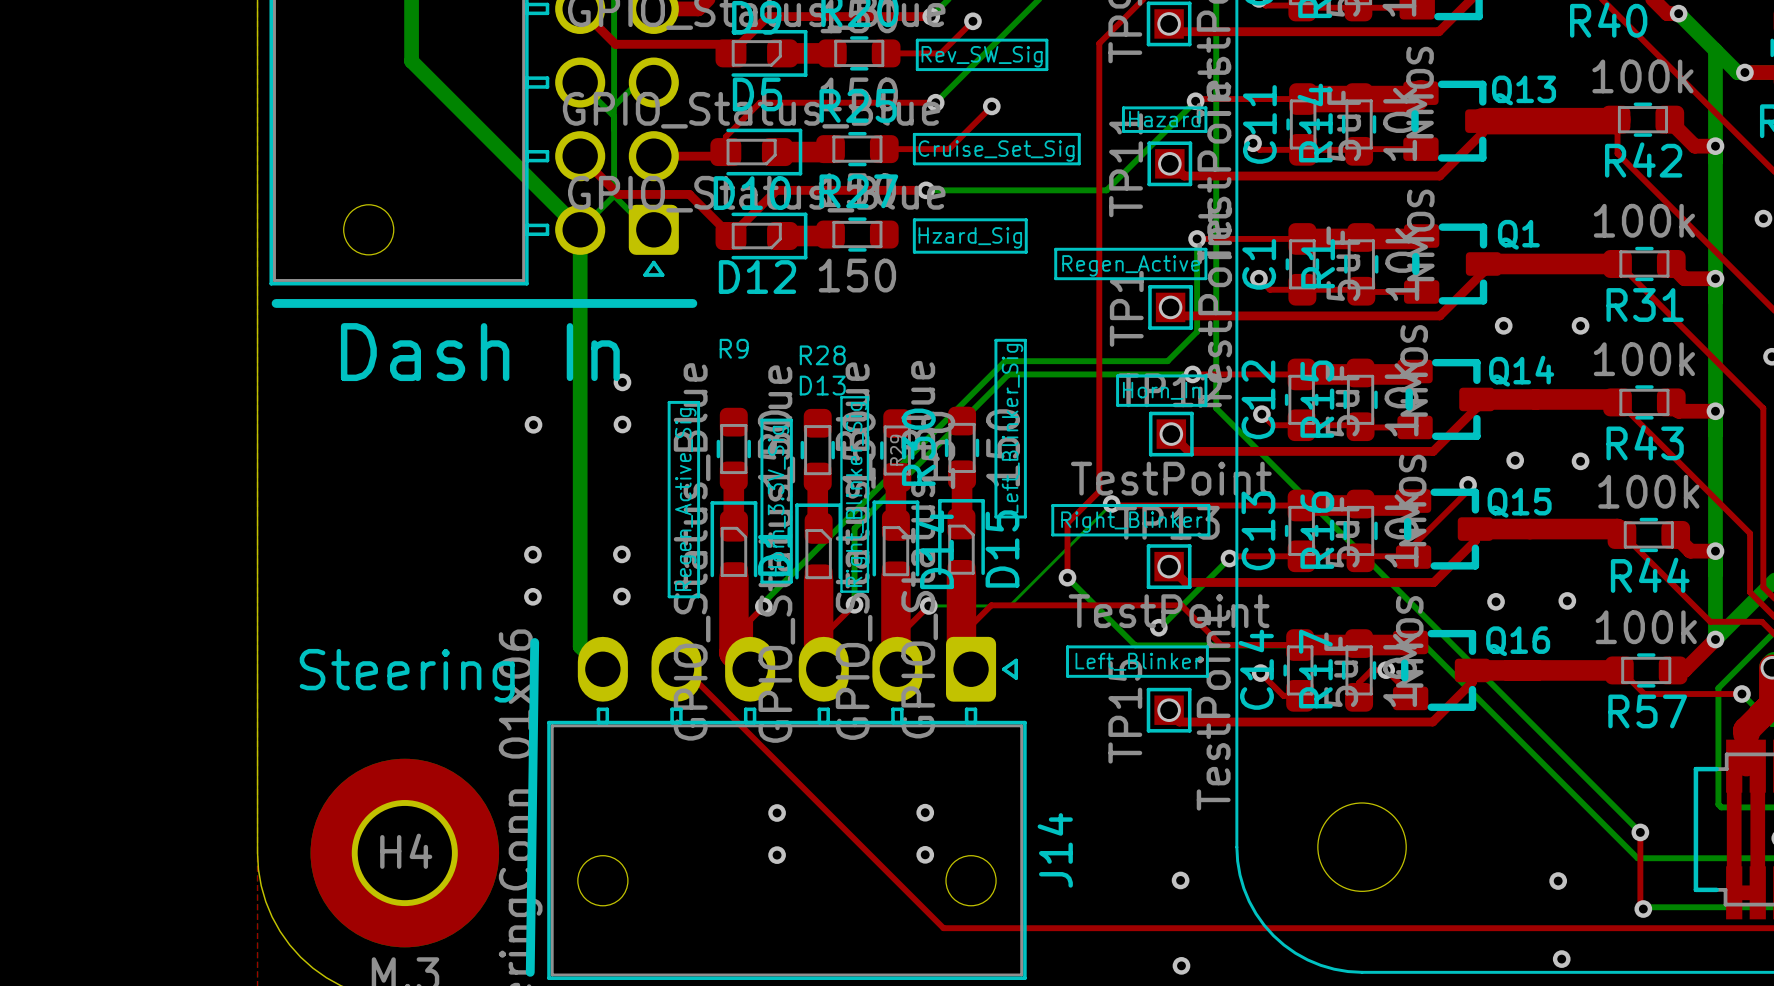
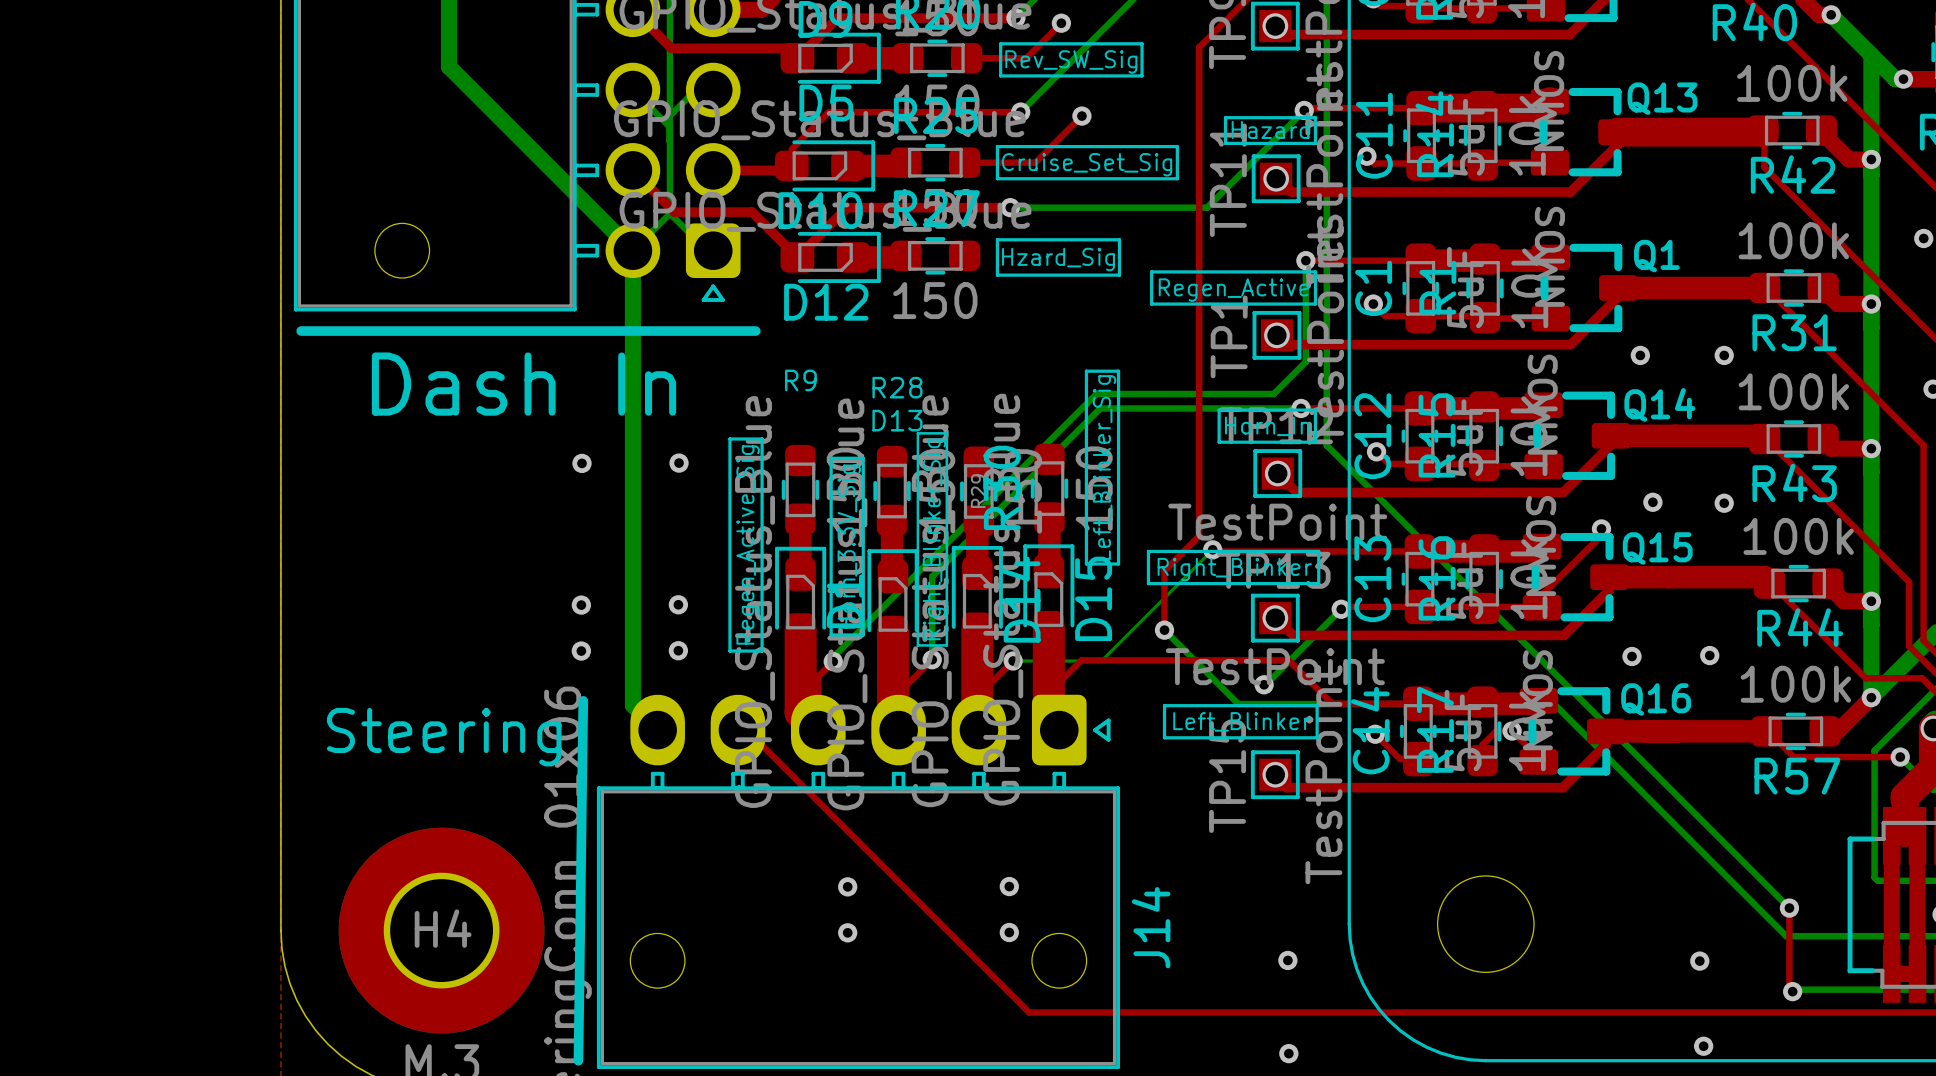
via: (622, 382) -> none

